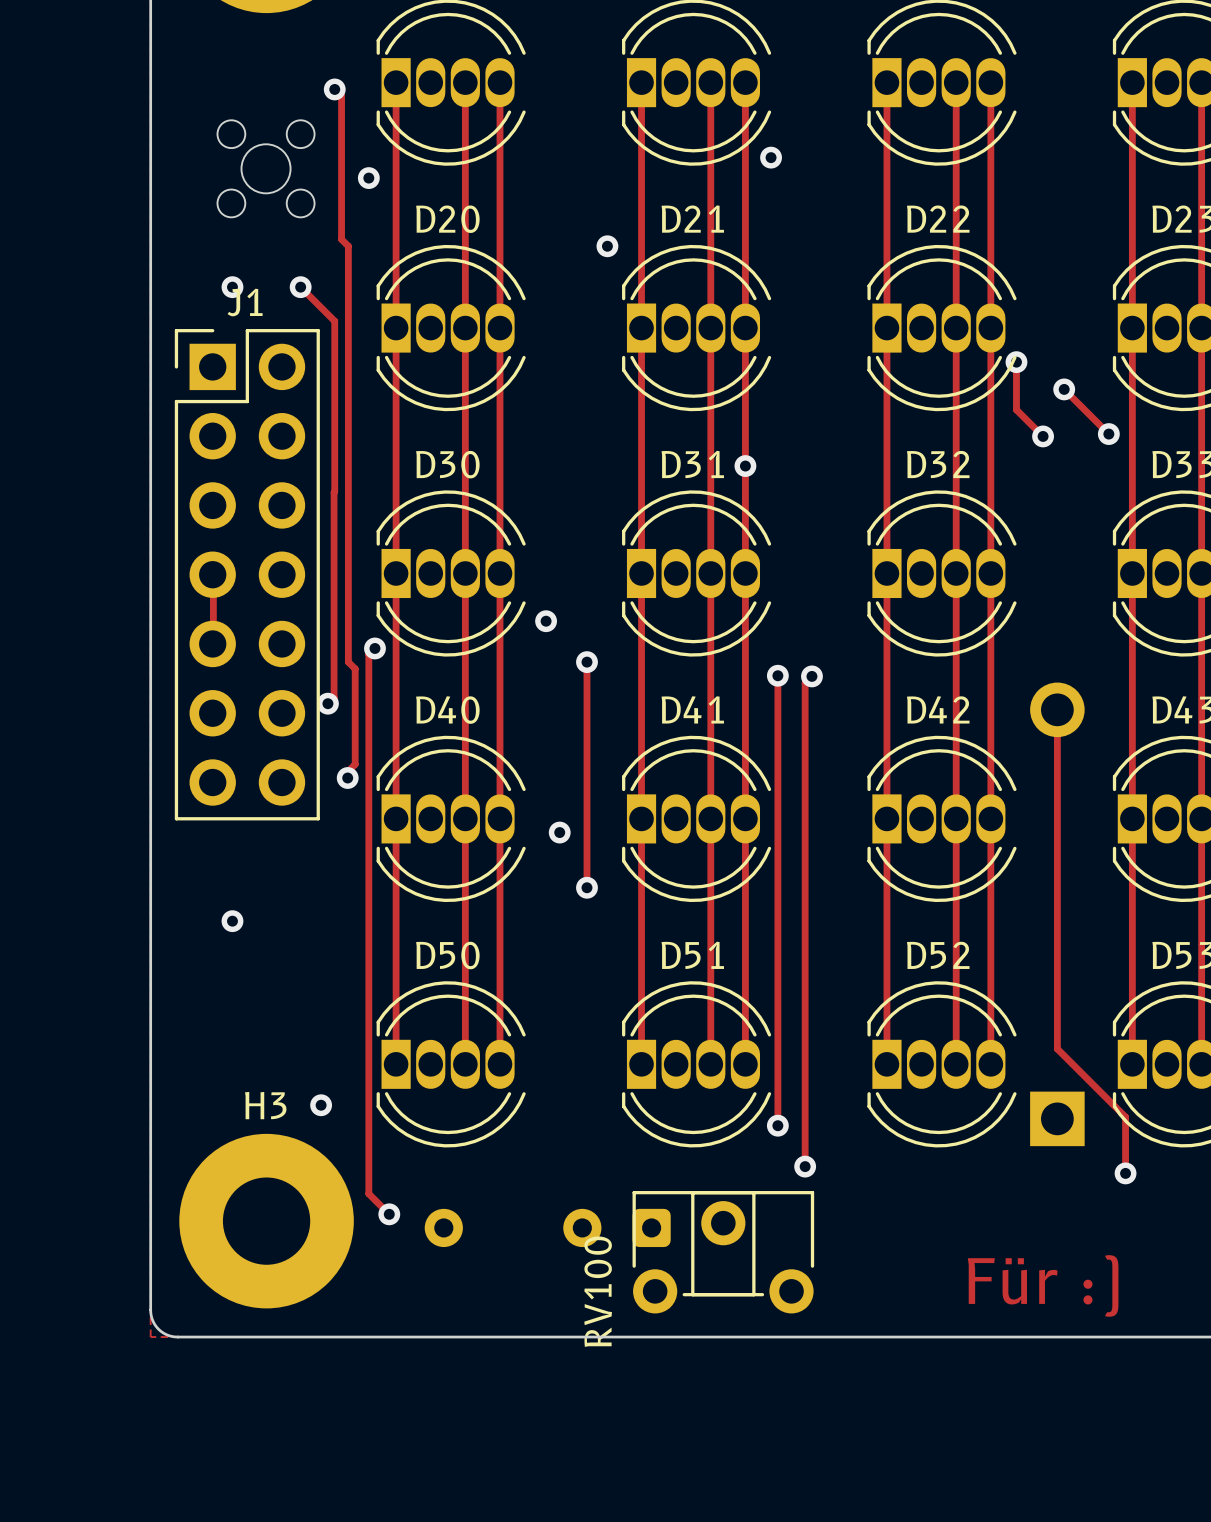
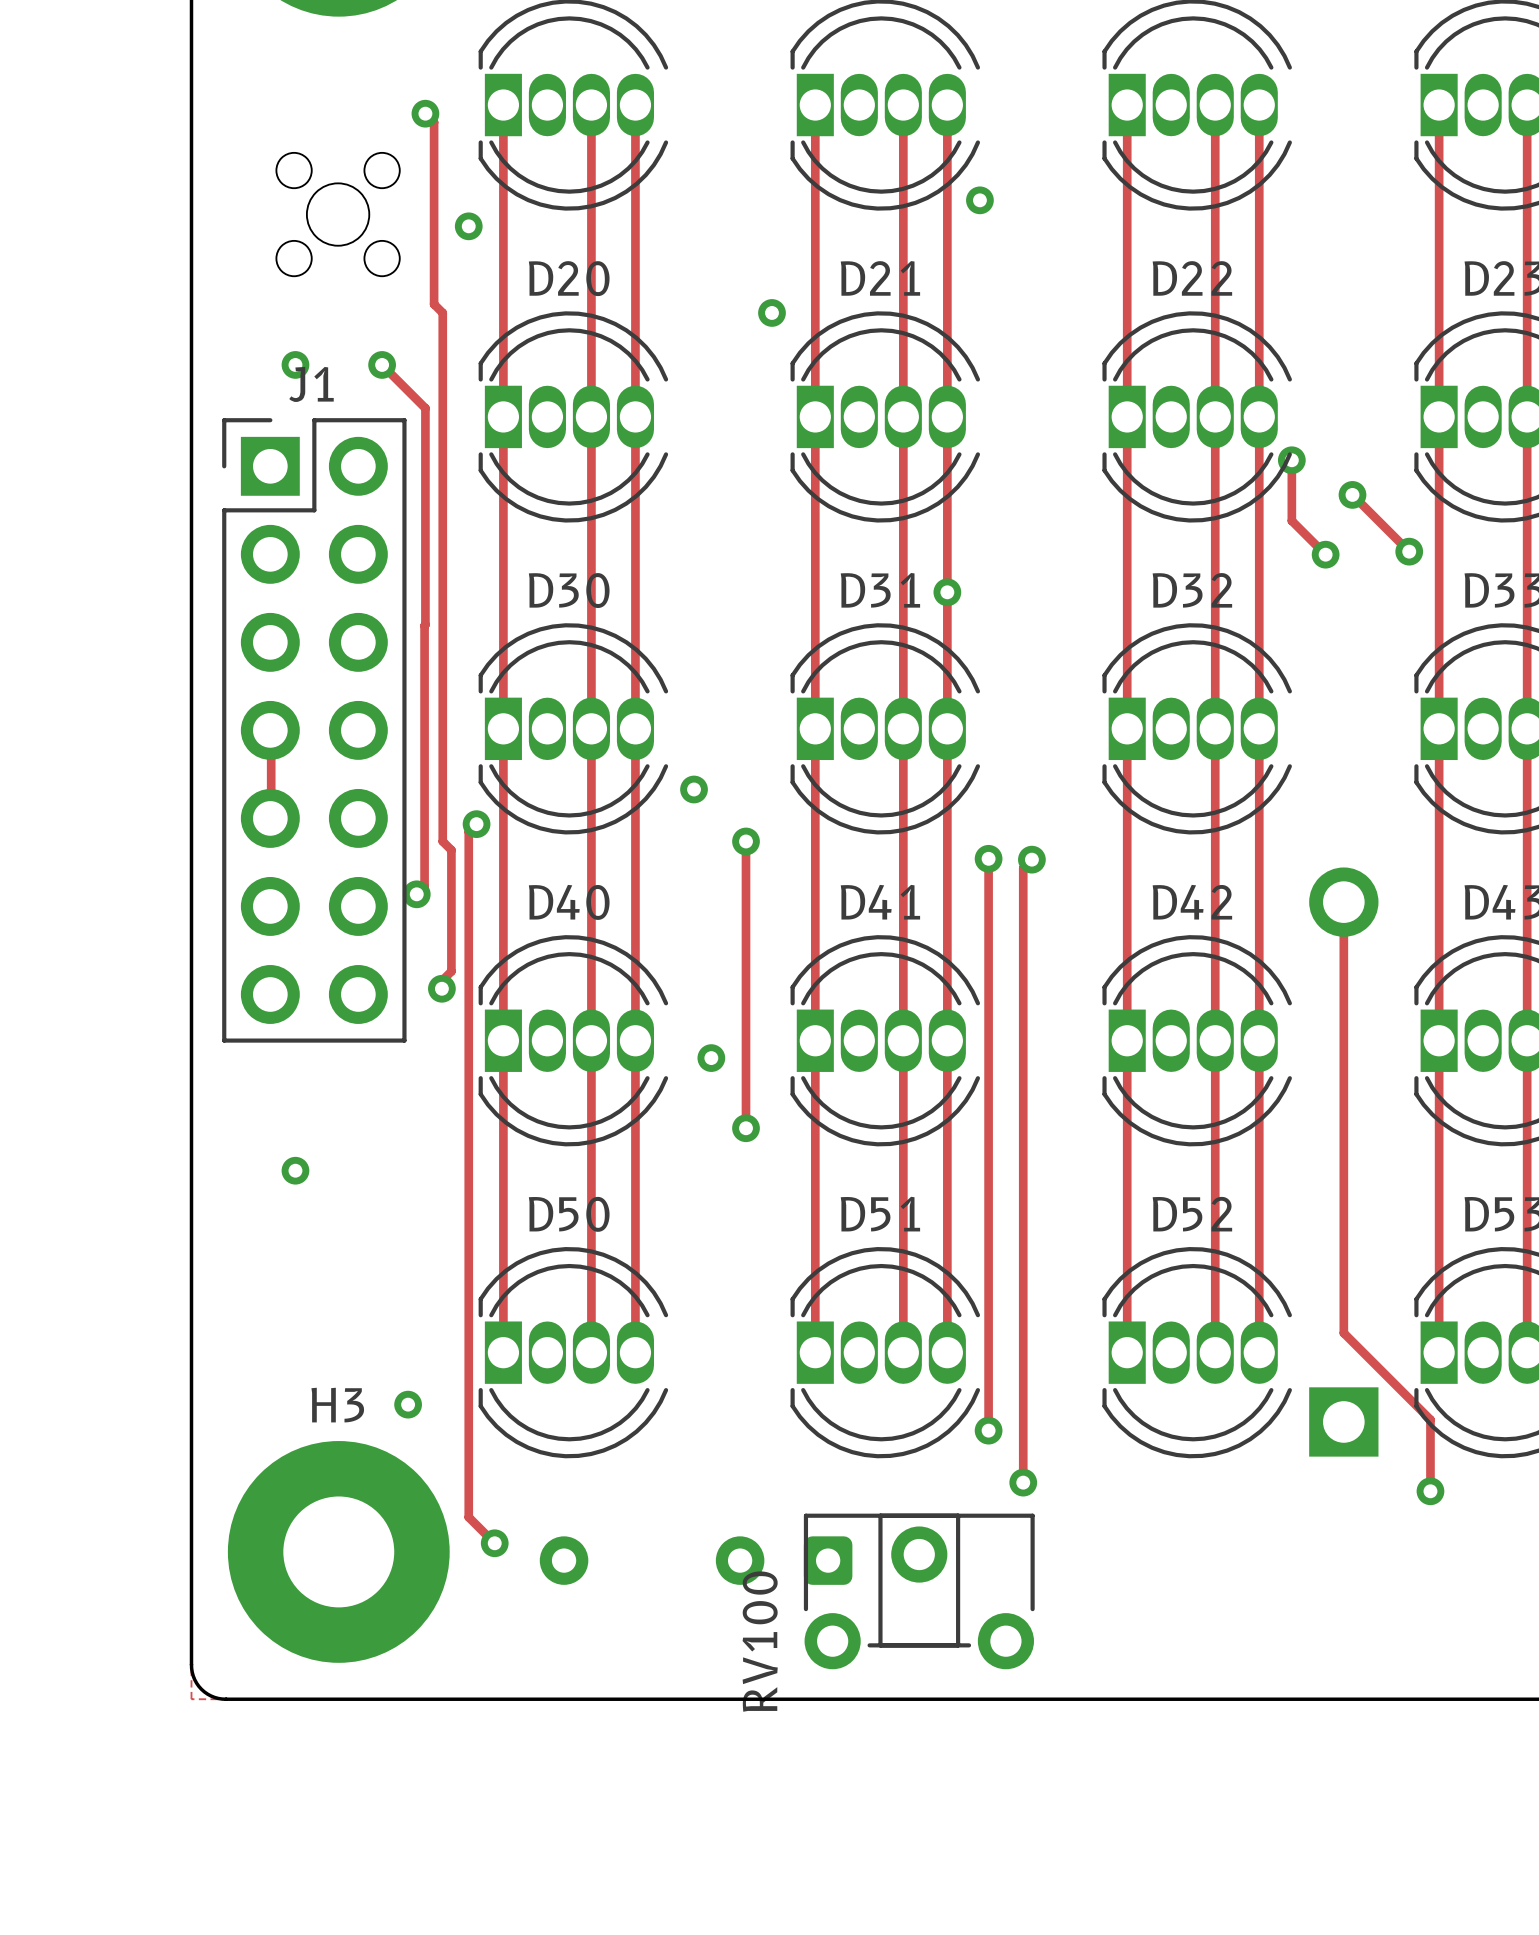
text: Für :) (1043, 1285) -> none

